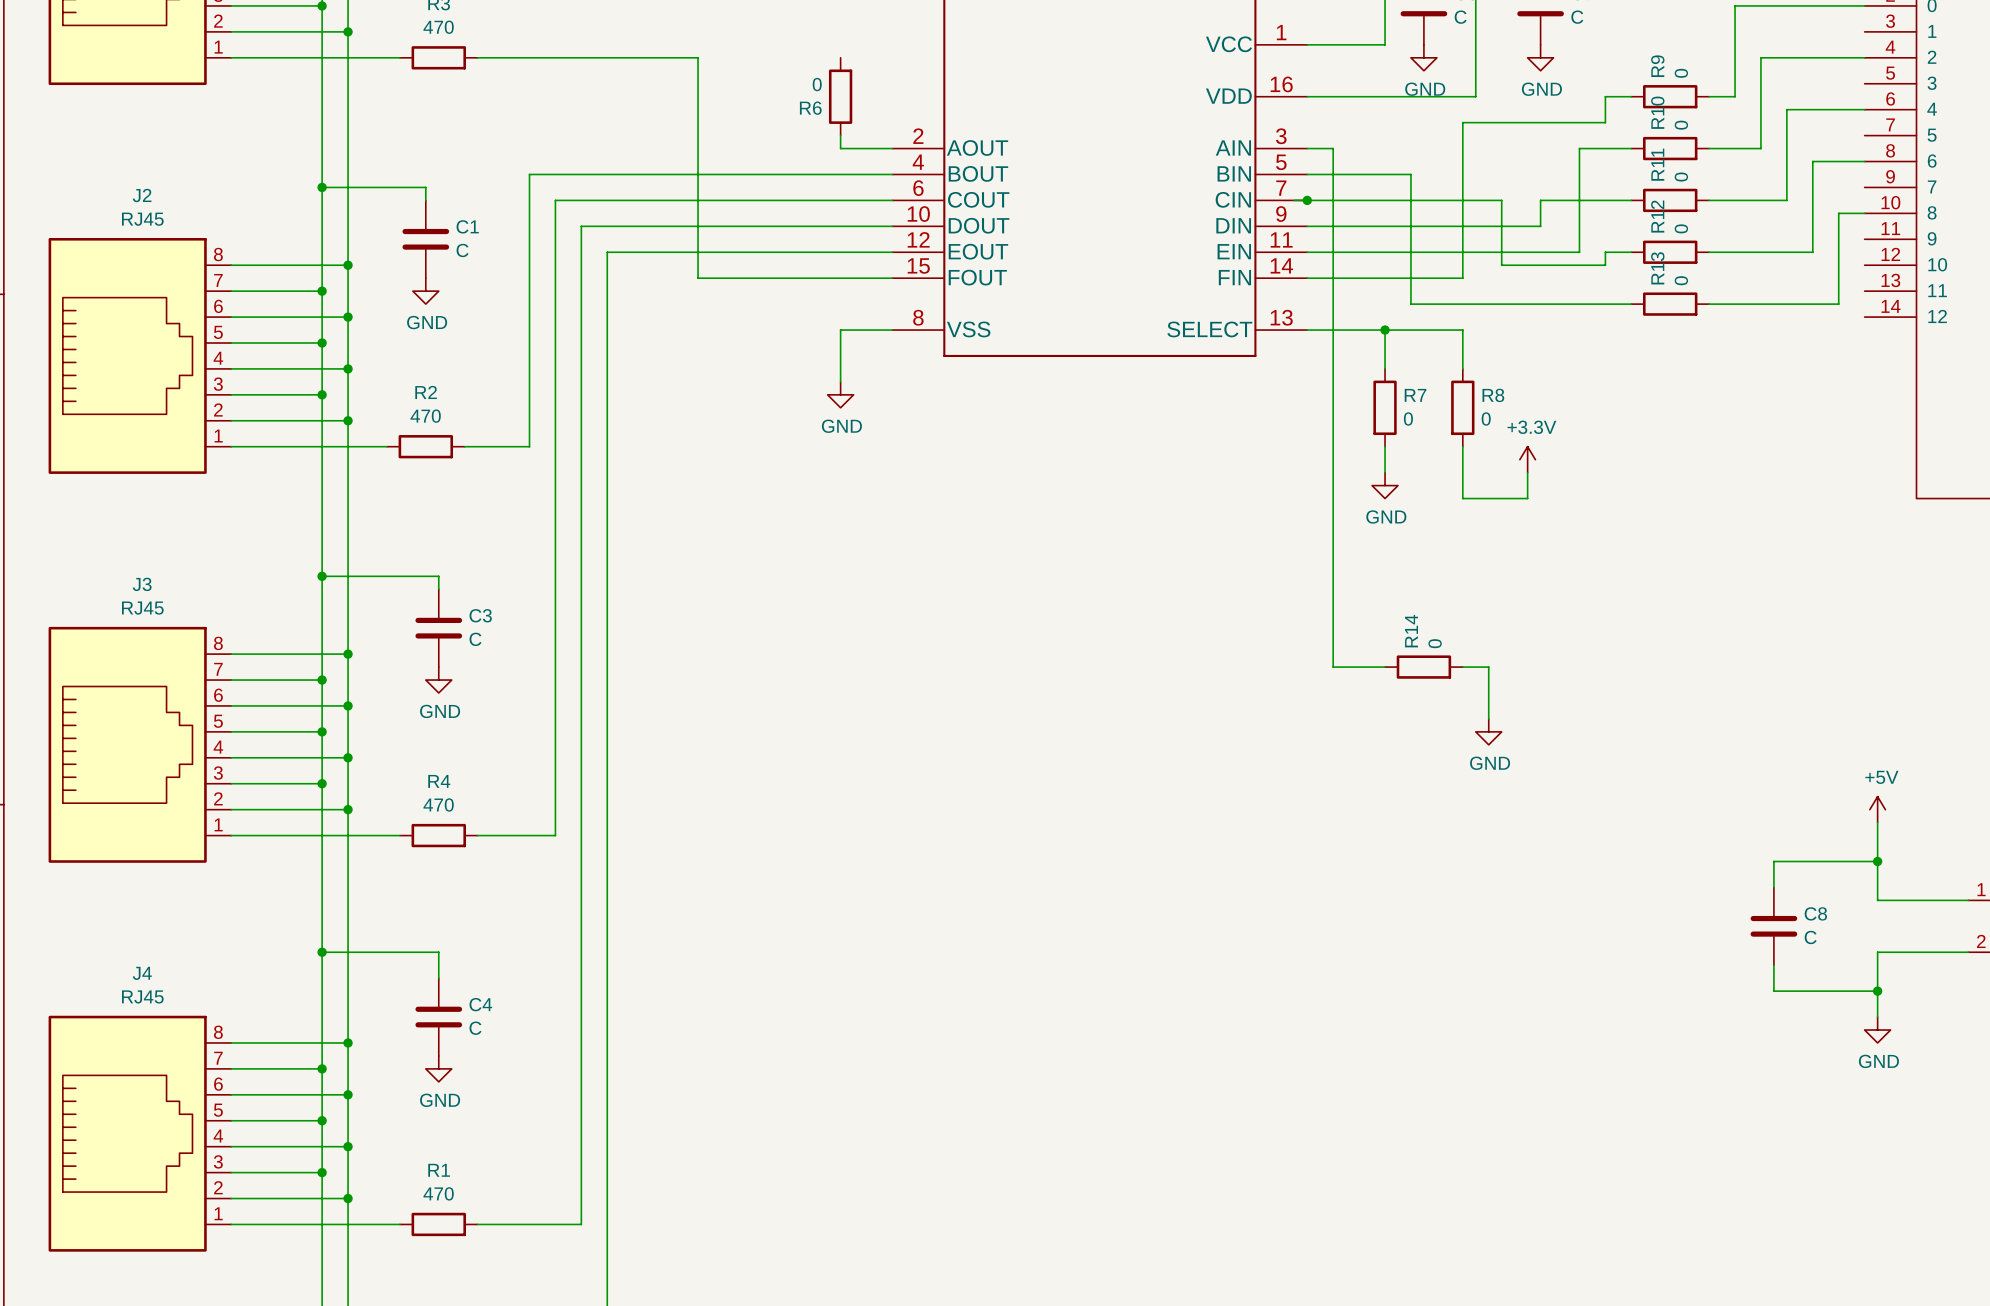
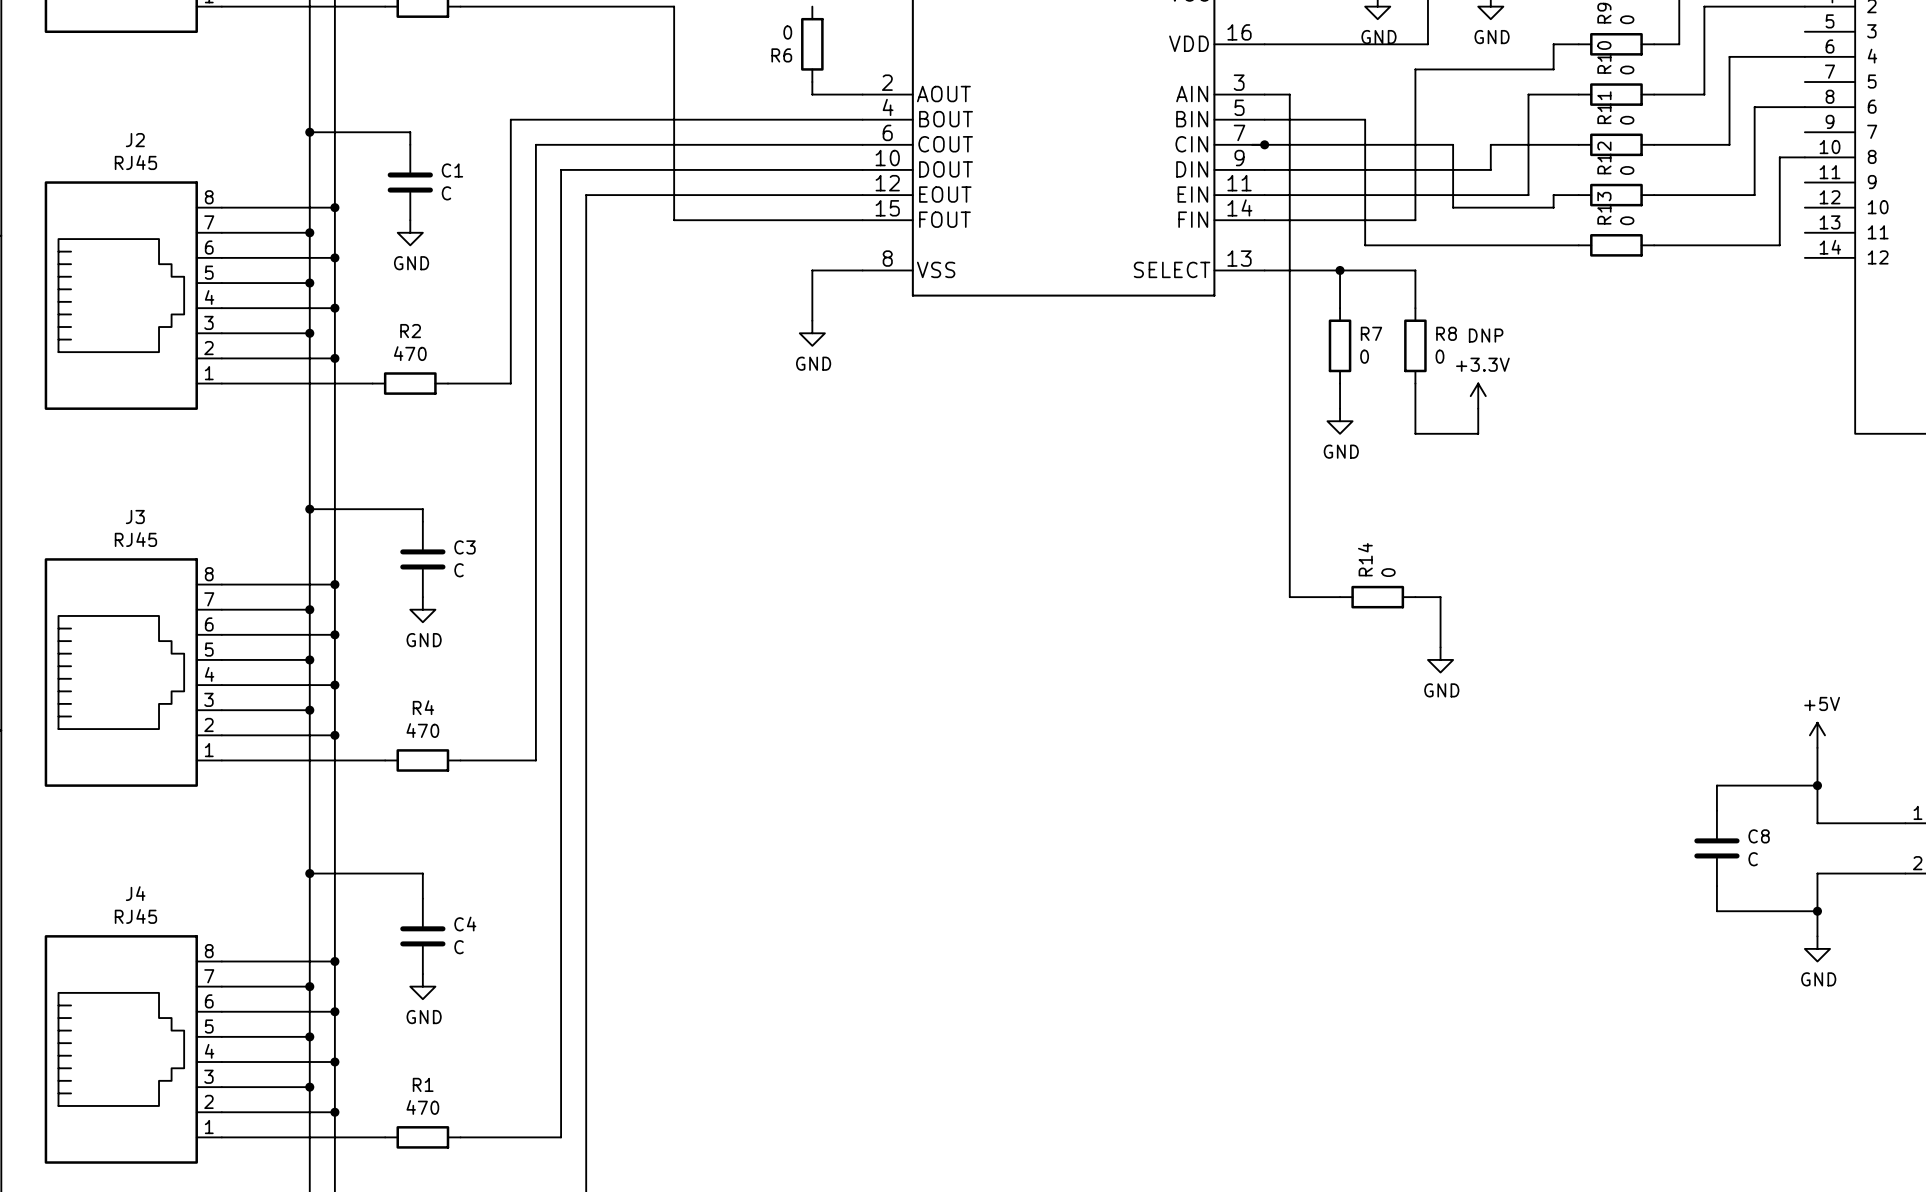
text: none -> DNP (1486, 335)

